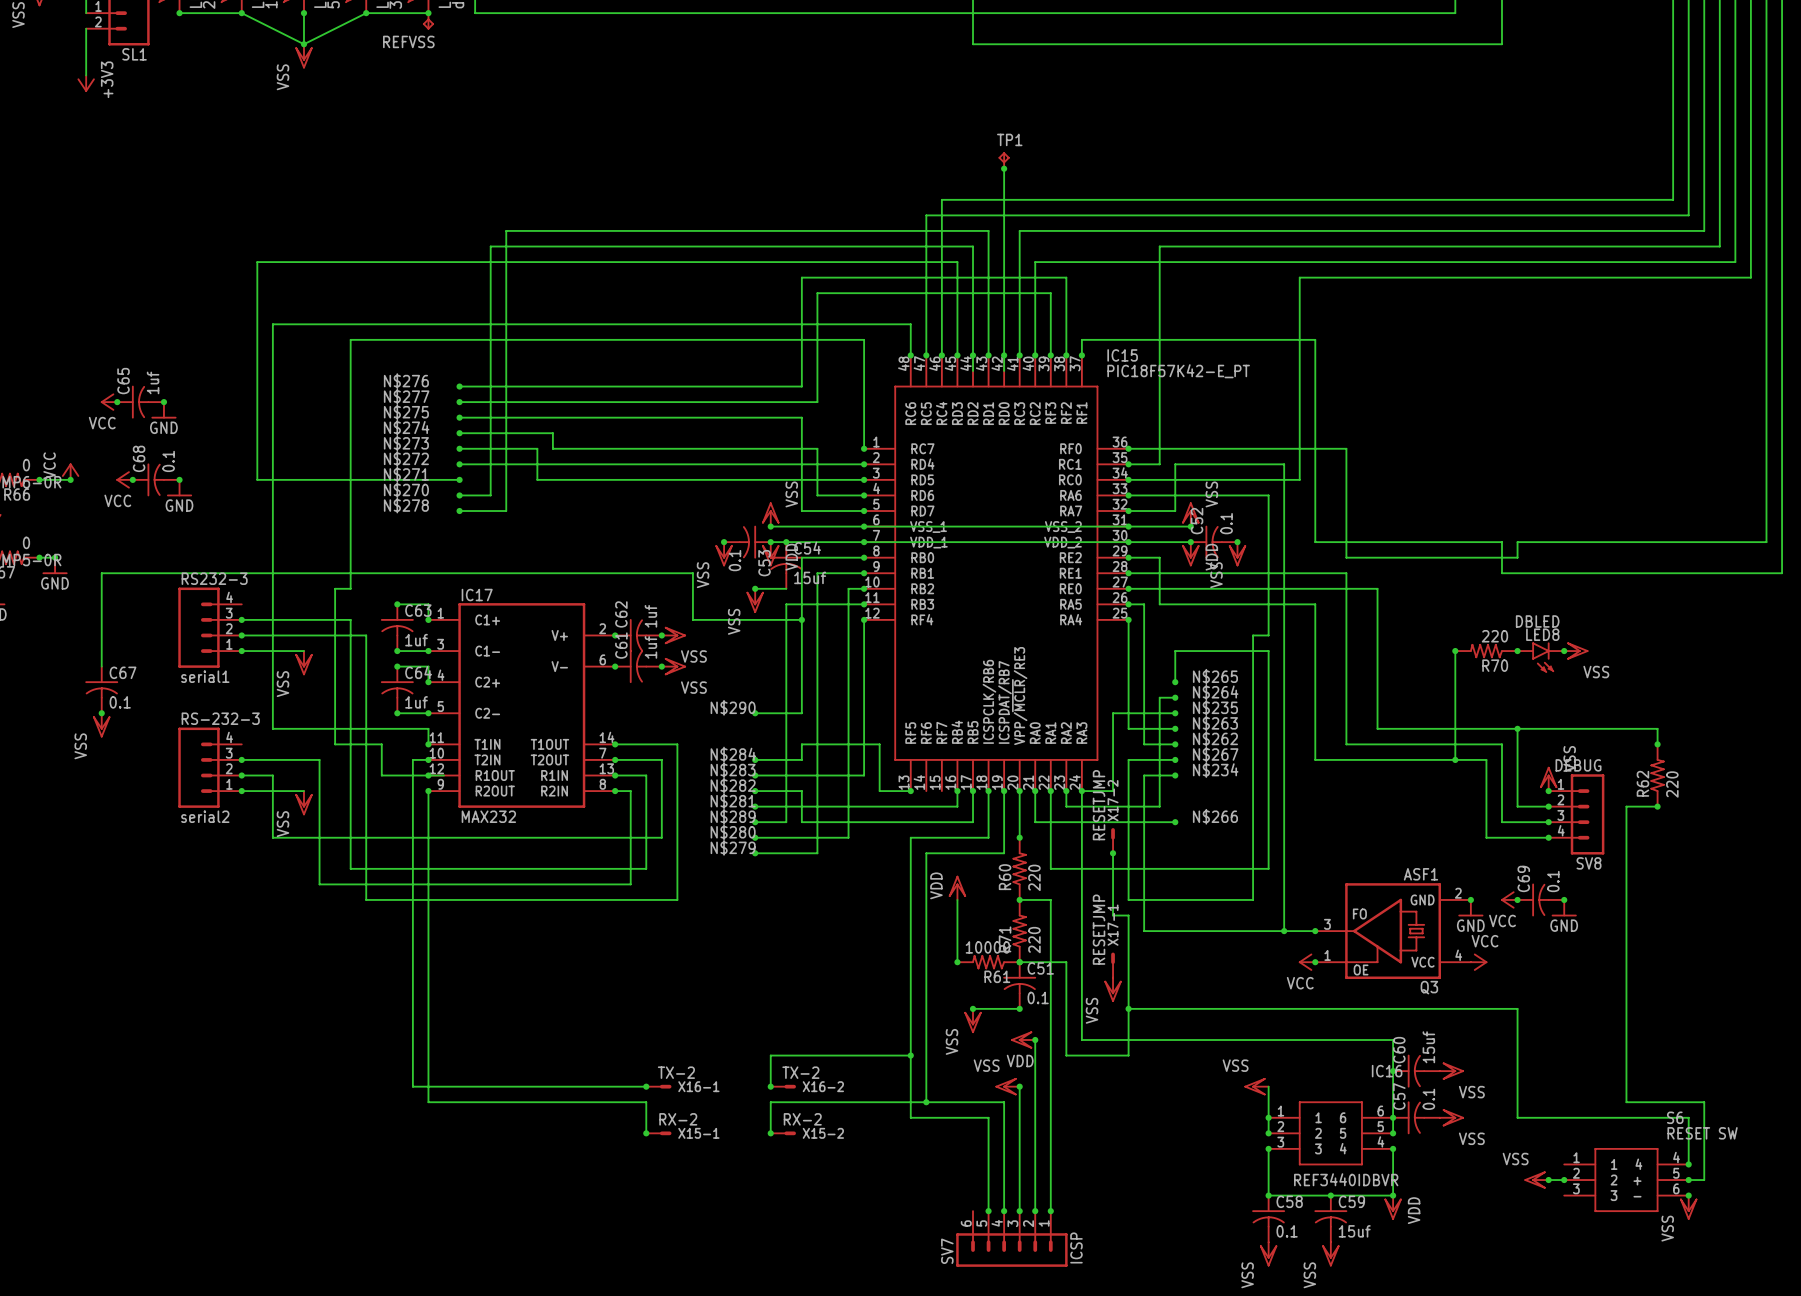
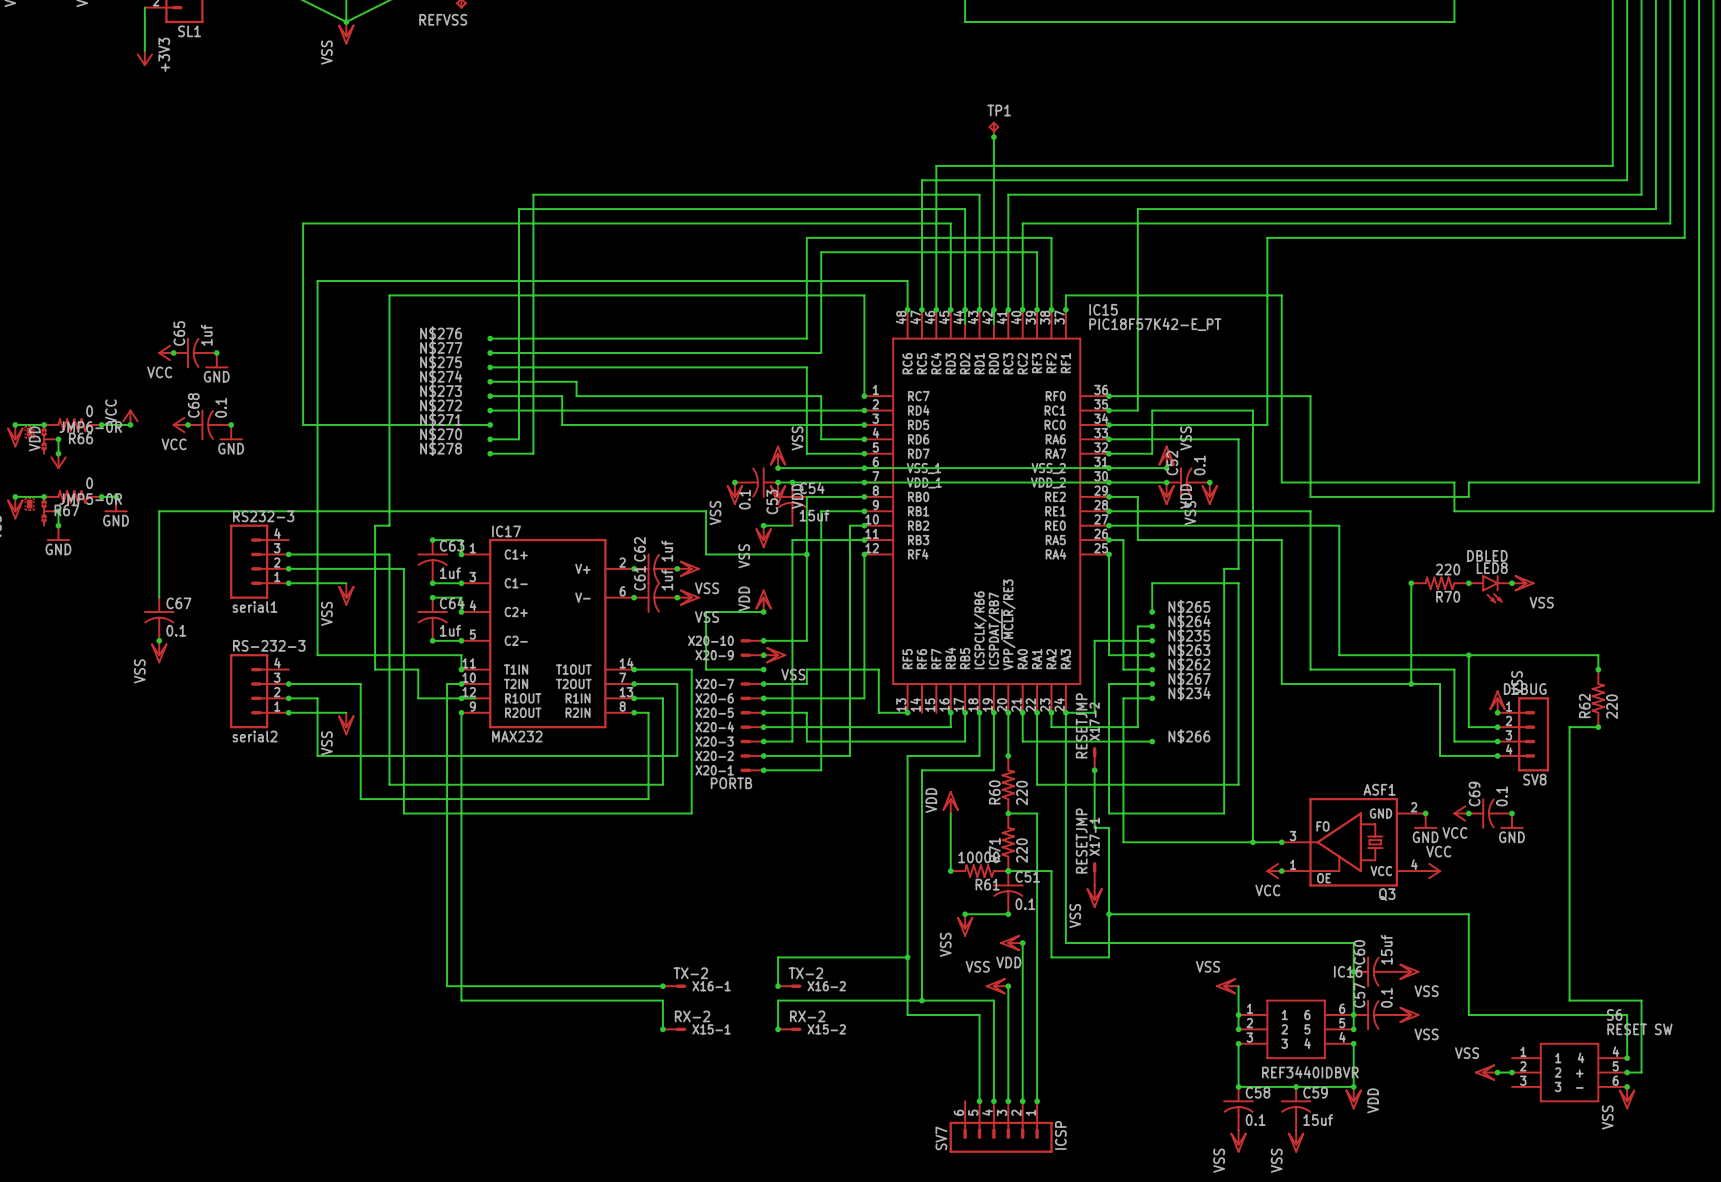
power symbol: none -> VDD (763, 600)
wire: none -> (763, 612) (706, 612) (706, 669) (763, 669)
junction: none -> (763, 612)
label: N$290 (733, 707) -> none
X20-10: none -> (752, 640)
X20-9: none -> (752, 655)
junction: none -> (763, 655)
power symbol: none -> VSS (774, 655)
junction: none -> (763, 669)
label: N$284 (733, 754) -> none
X20-7: none -> (752, 683)
label: N$283 (733, 770) -> none
X20-6: none -> (752, 698)
label: N$282 (733, 785) -> none
X20-5: none -> (752, 712)
label: N$281 (733, 801) -> none
X20-4: none -> (752, 727)
label: N$289 (733, 816) -> none
X20-3: none -> (752, 741)
label: N$280 (733, 832) -> none
X20-2: none -> (752, 755)
label: N$279 (733, 847) -> none
X20-1: none -> PORTB (752, 770)

